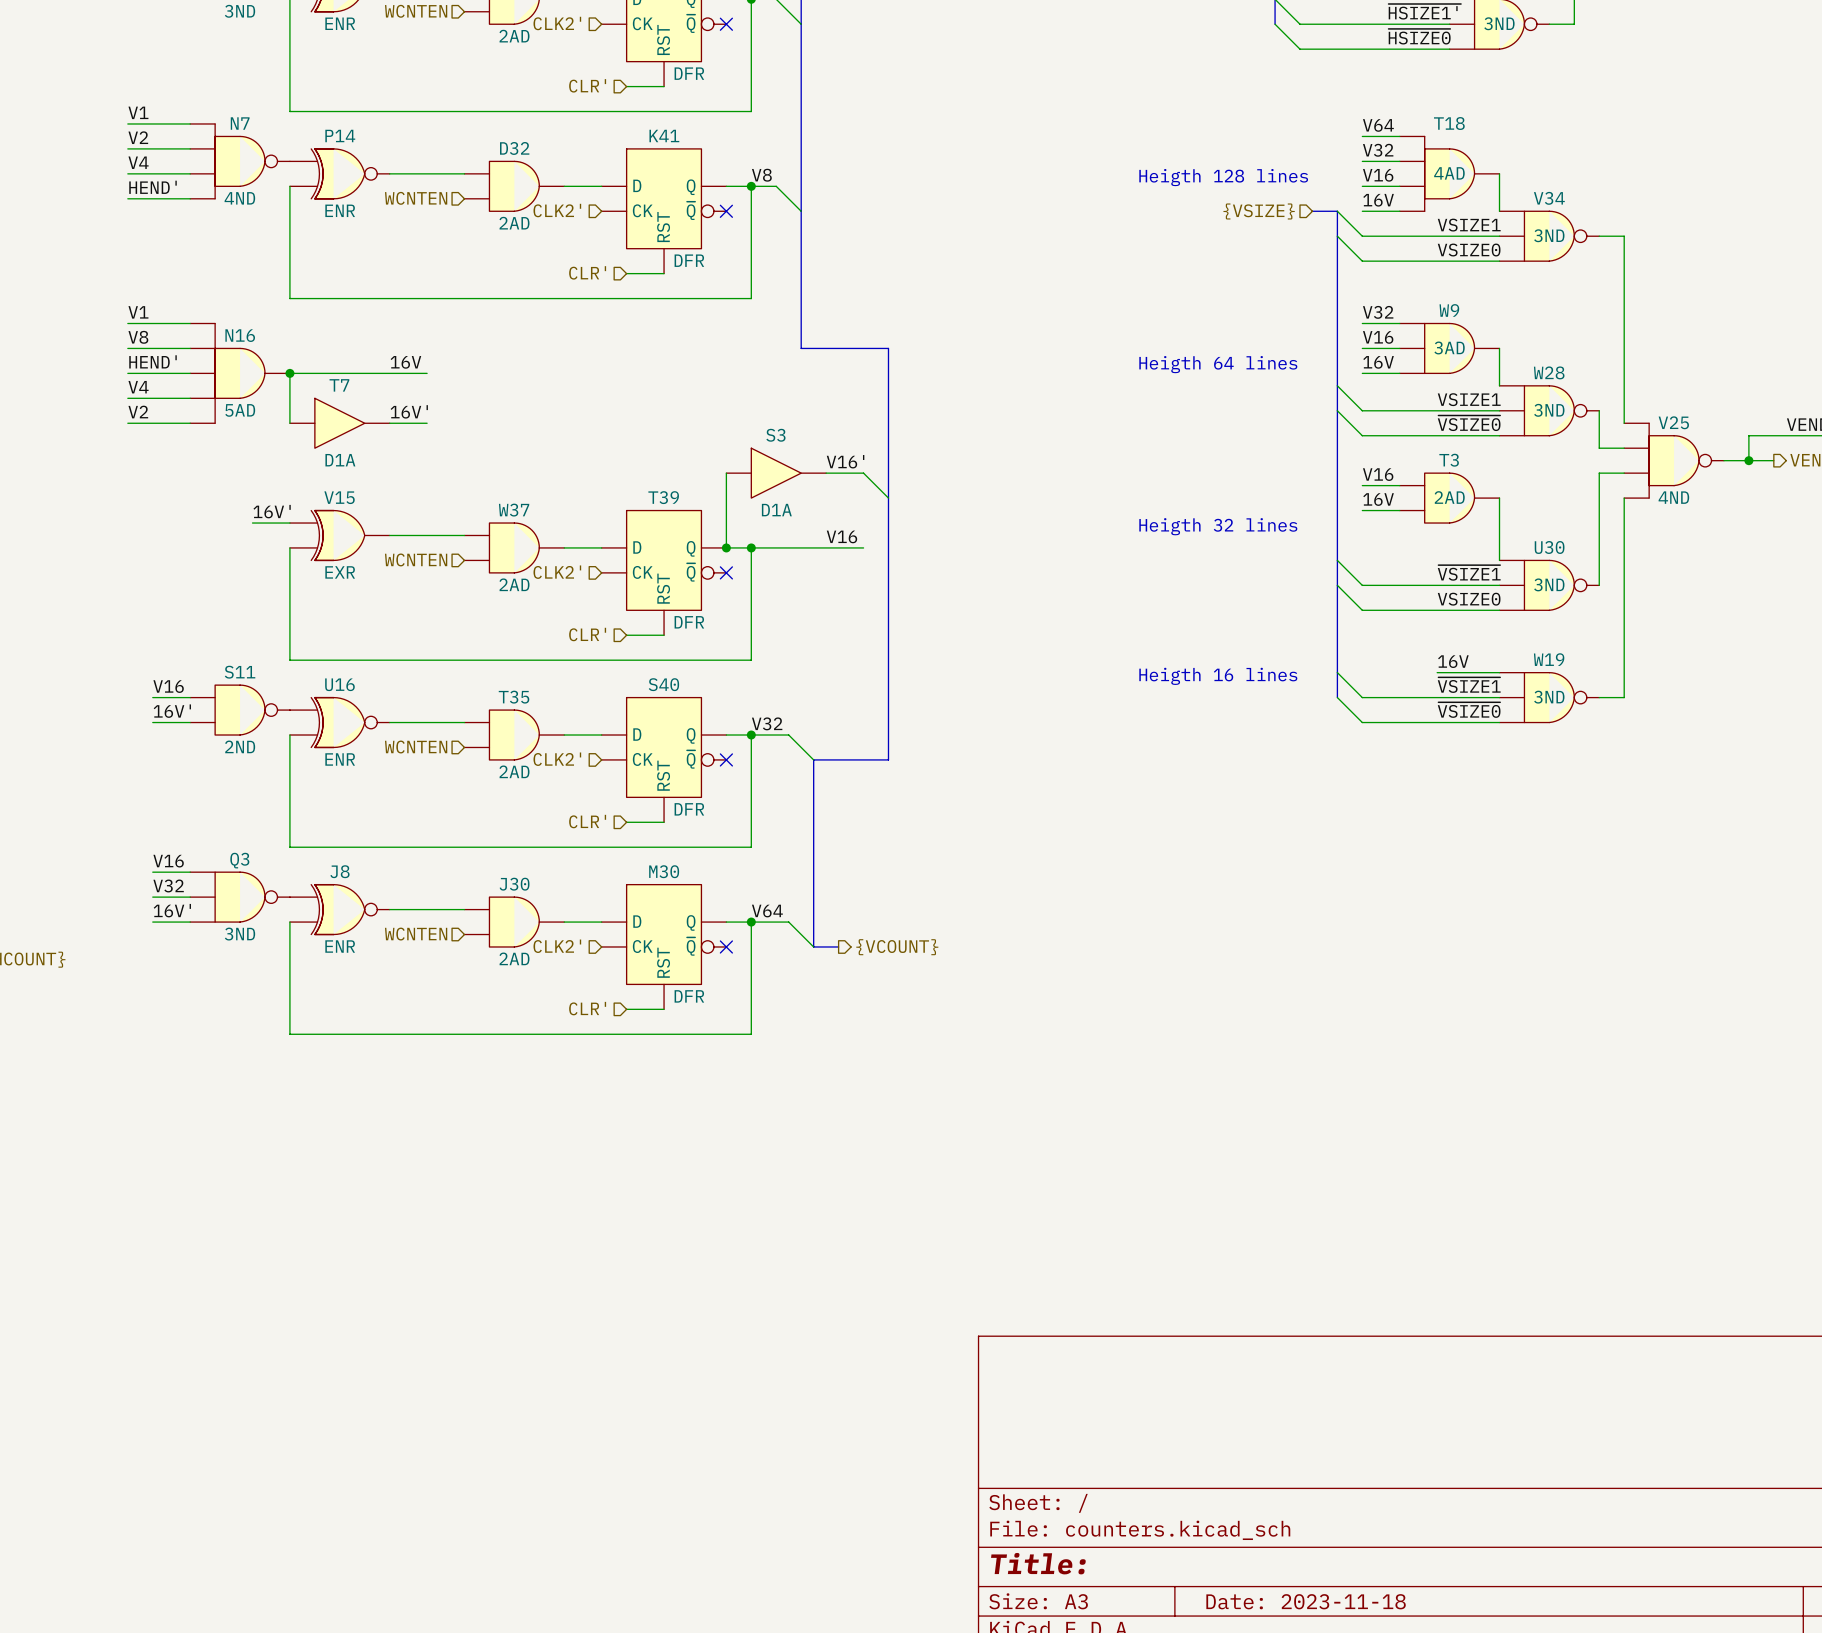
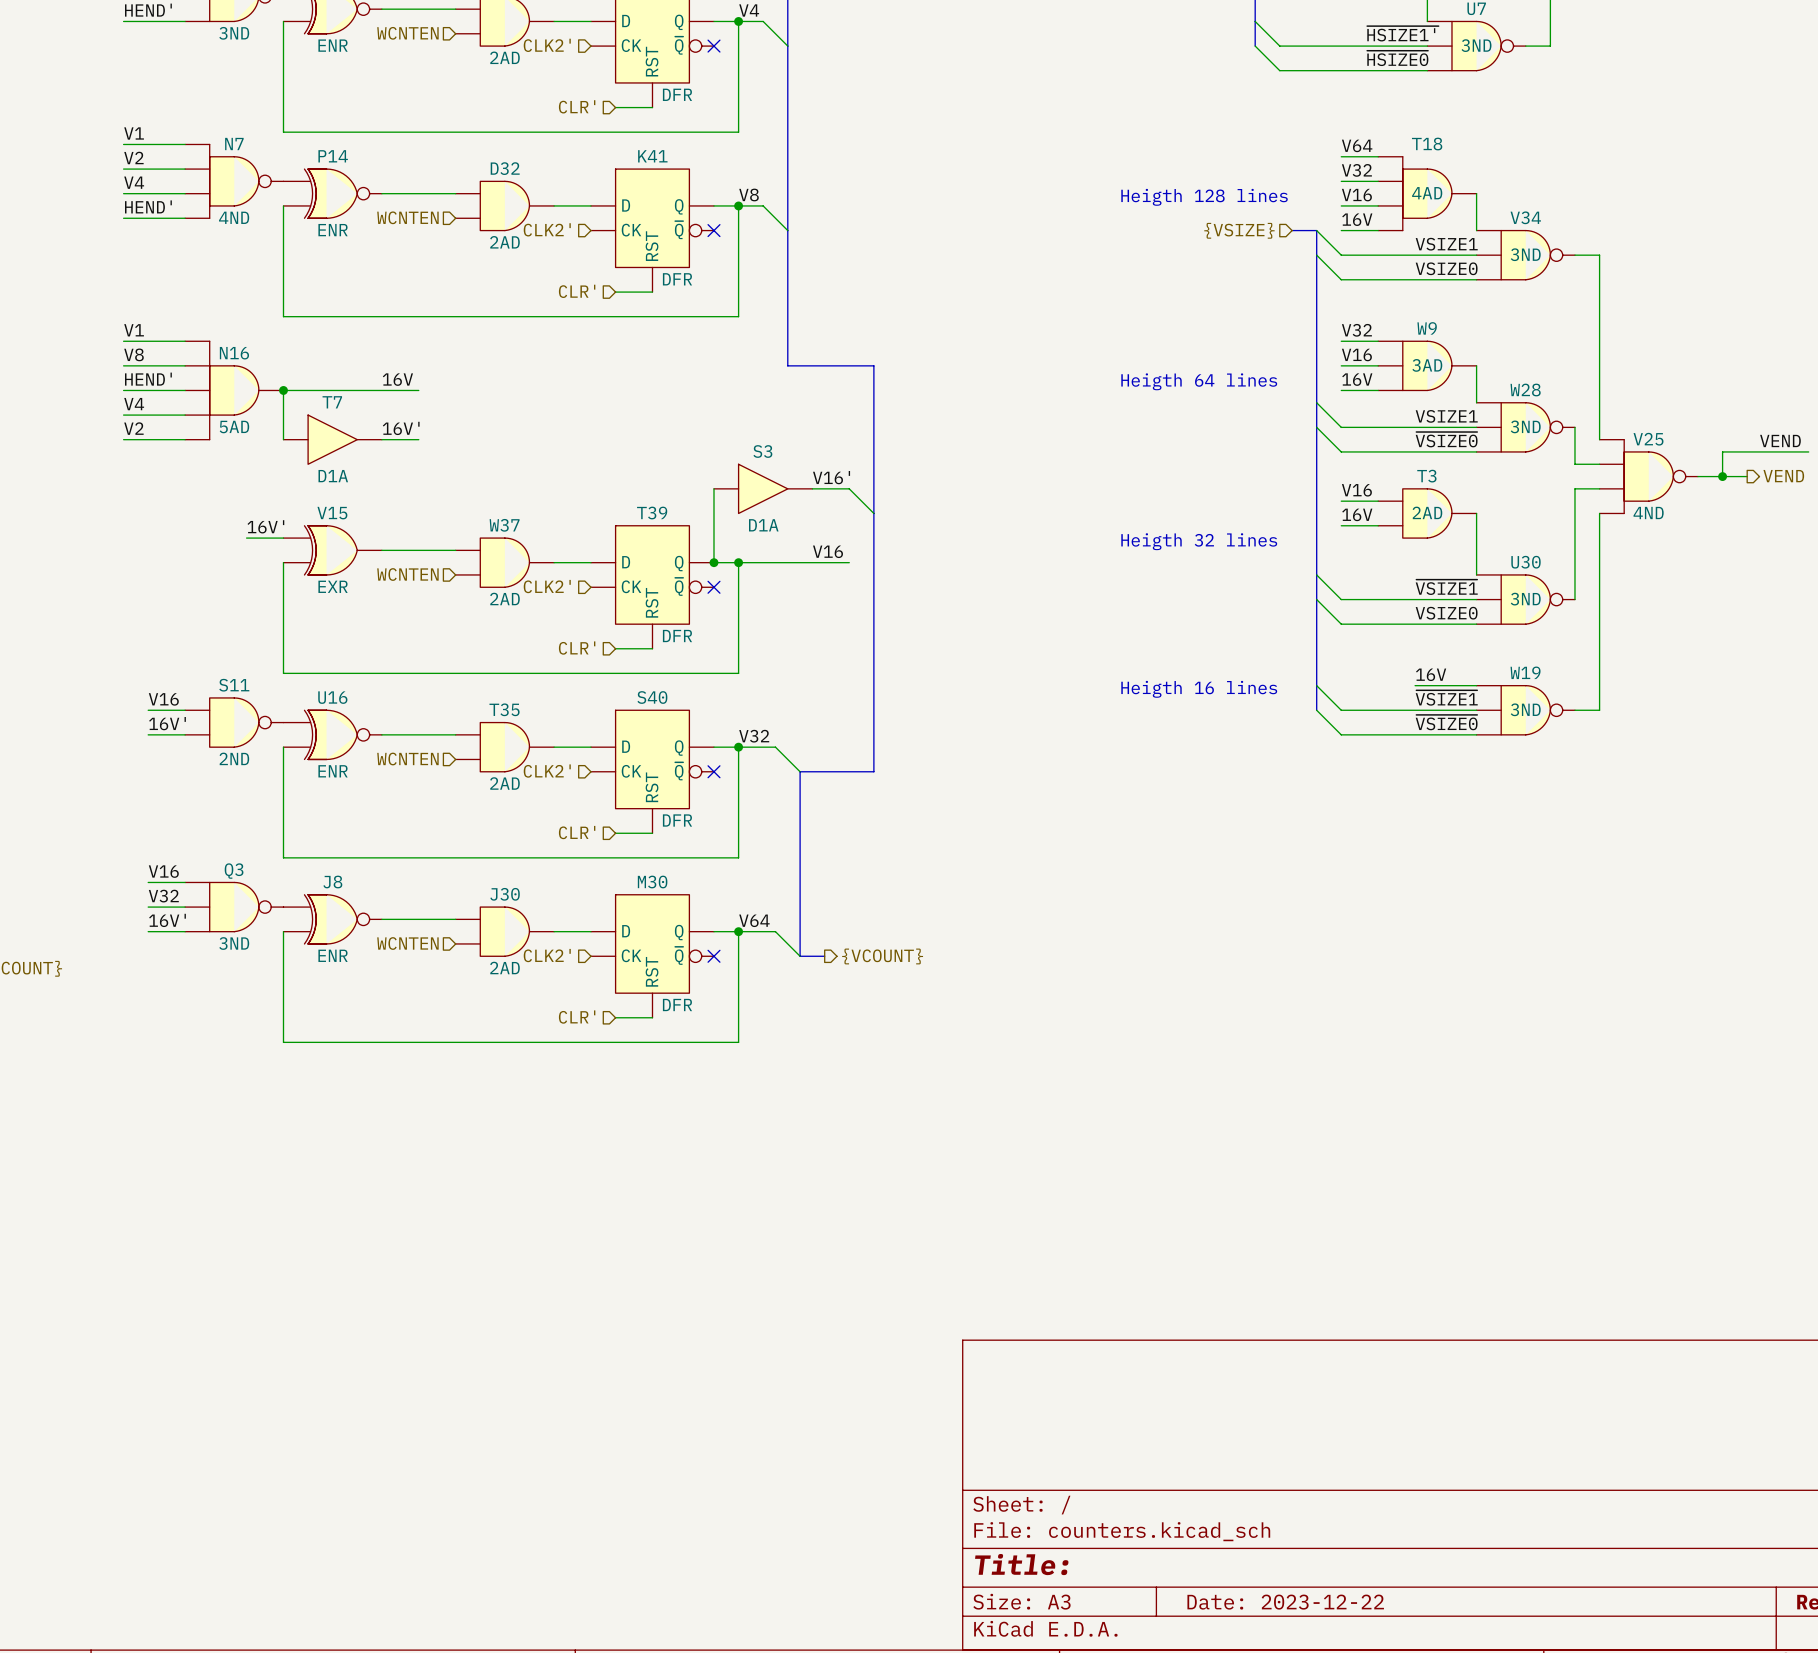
title block: Date: 2023-11-18 (1306, 1601) -> Date: 2023-12-22 (1285, 1602)

